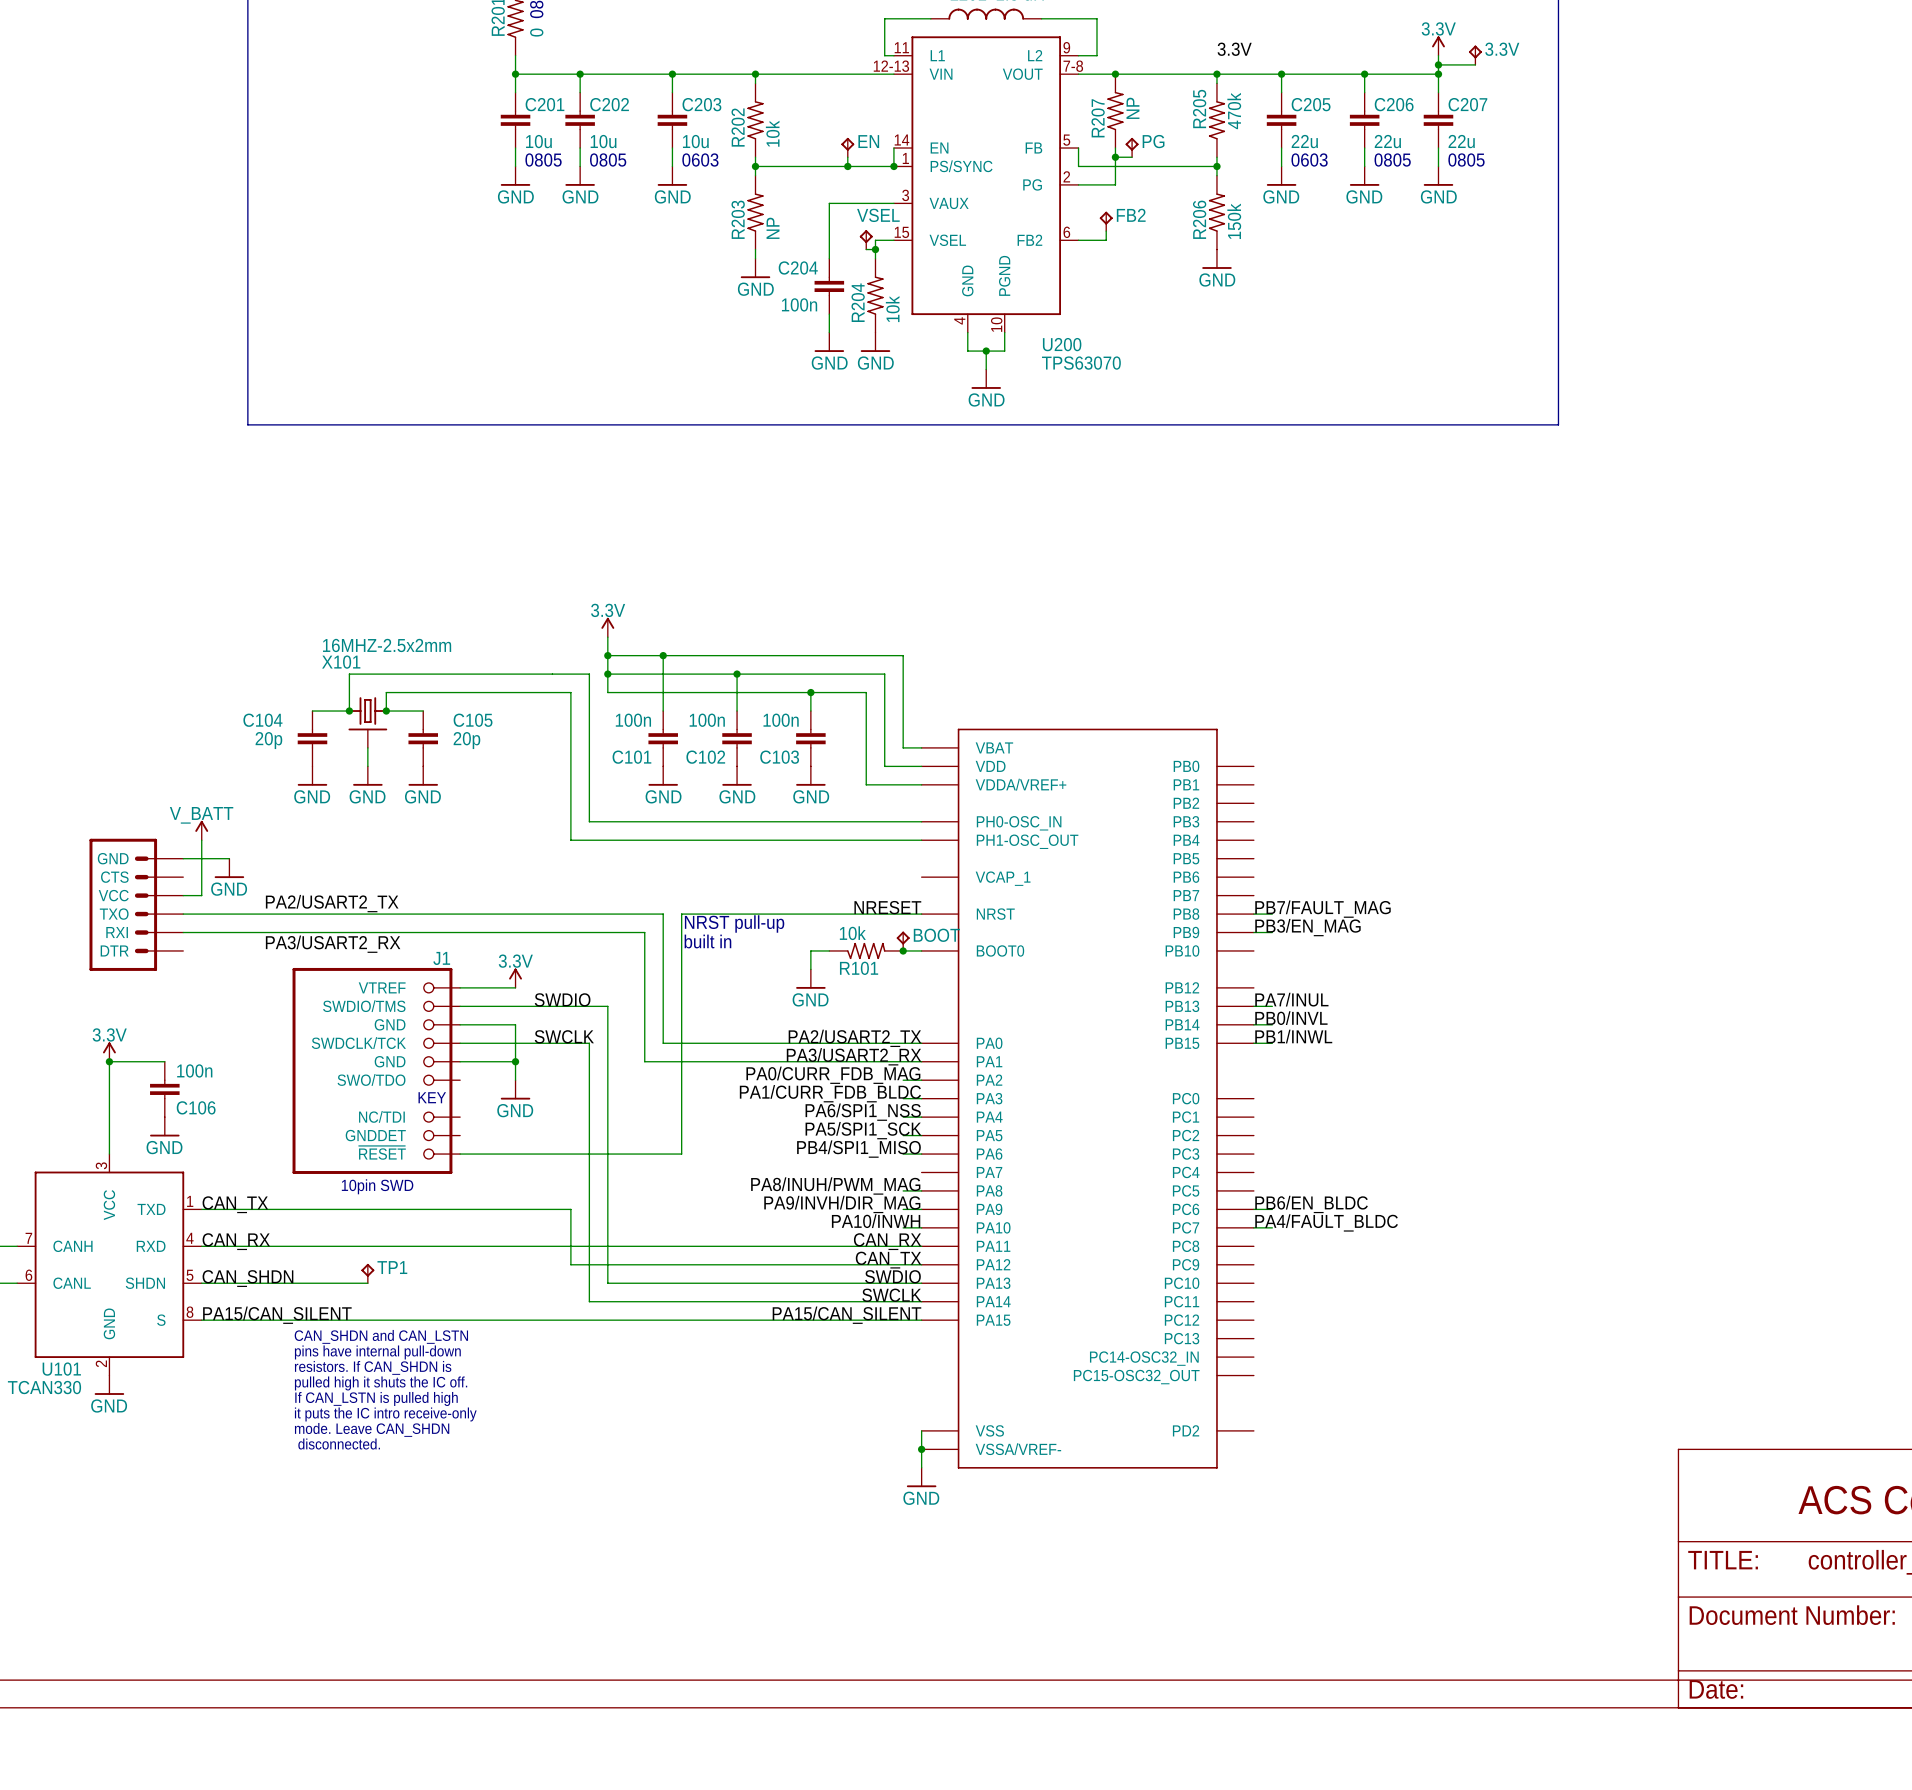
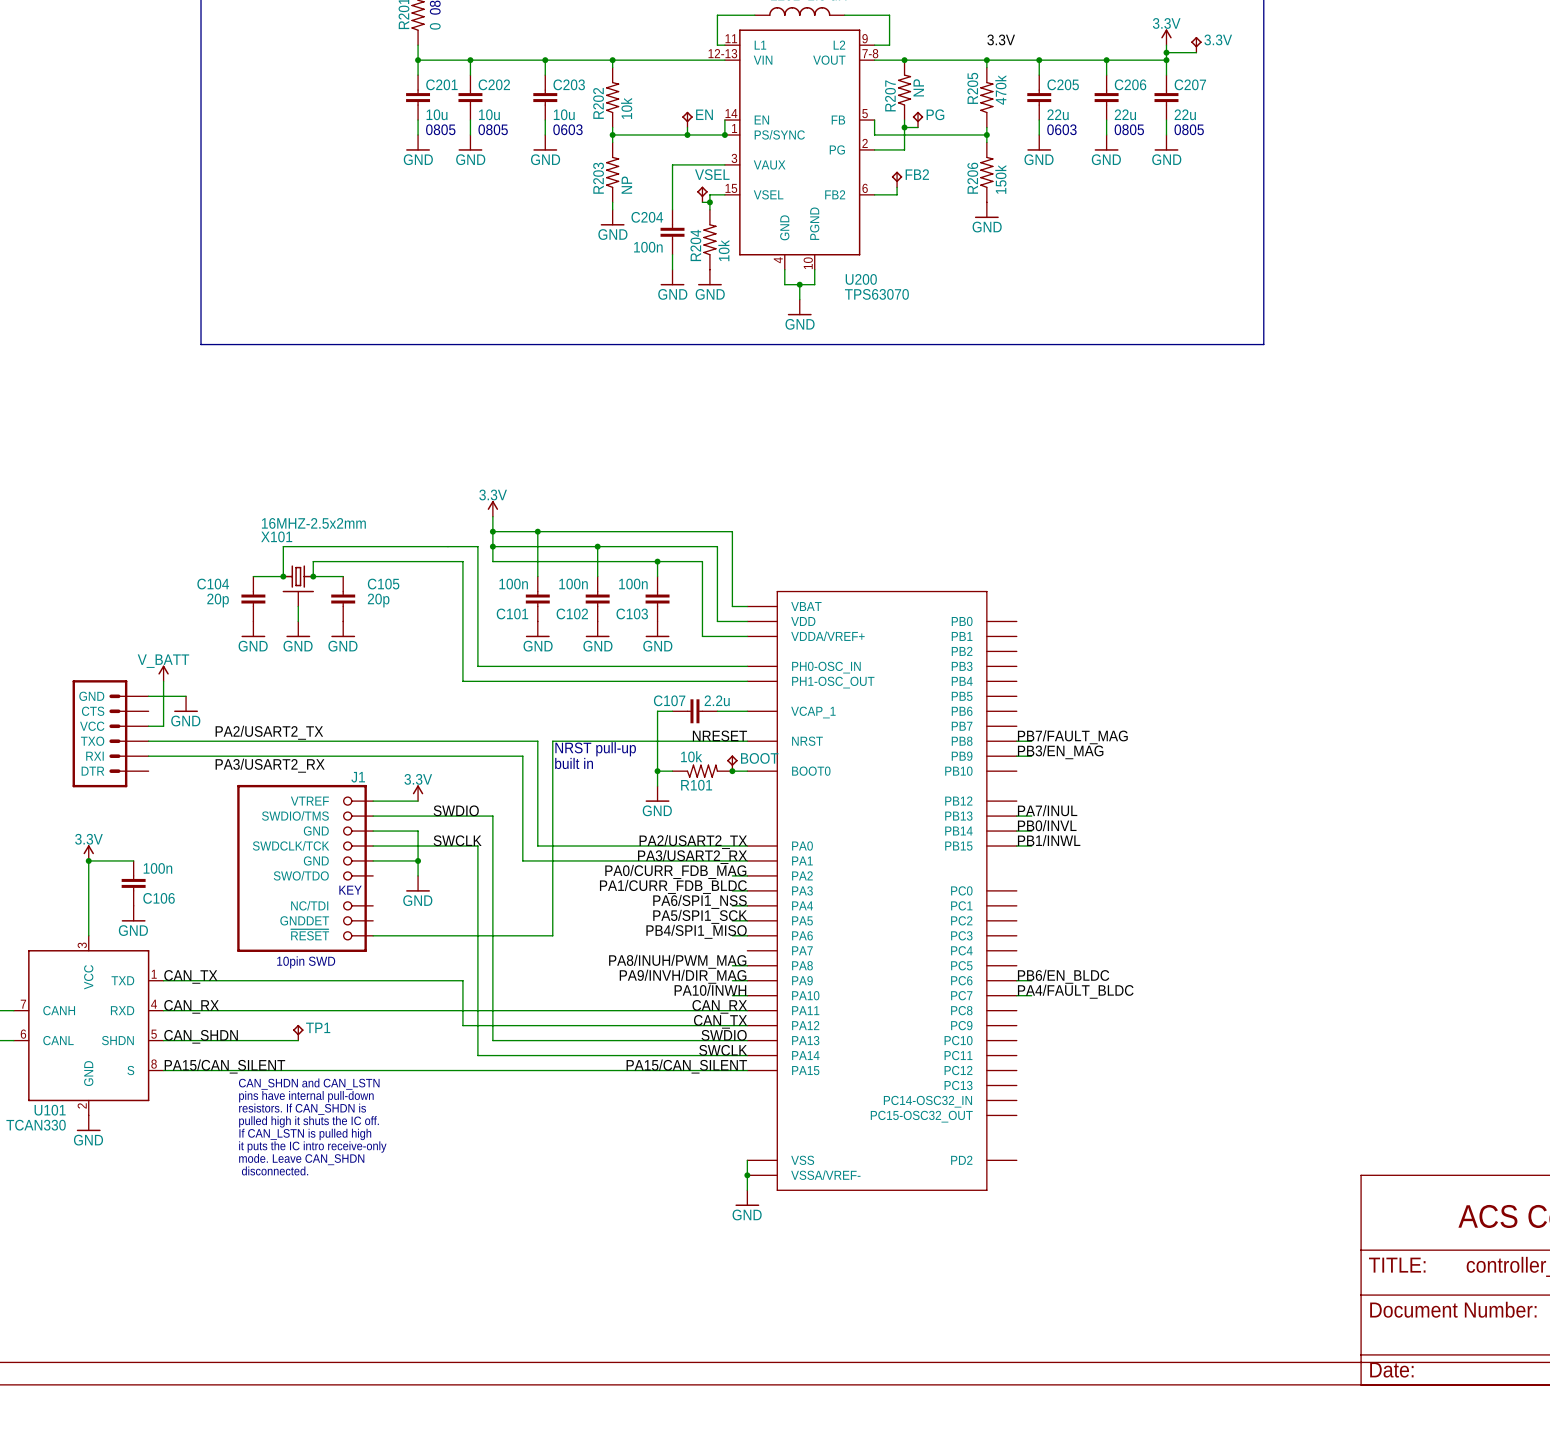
wire: none -> (672, 711) (657, 711) (657, 771)
C107: none -> 2.2u (694, 711)
wire: none -> (717, 711) (747, 711)
junction: none -> (657, 771)

